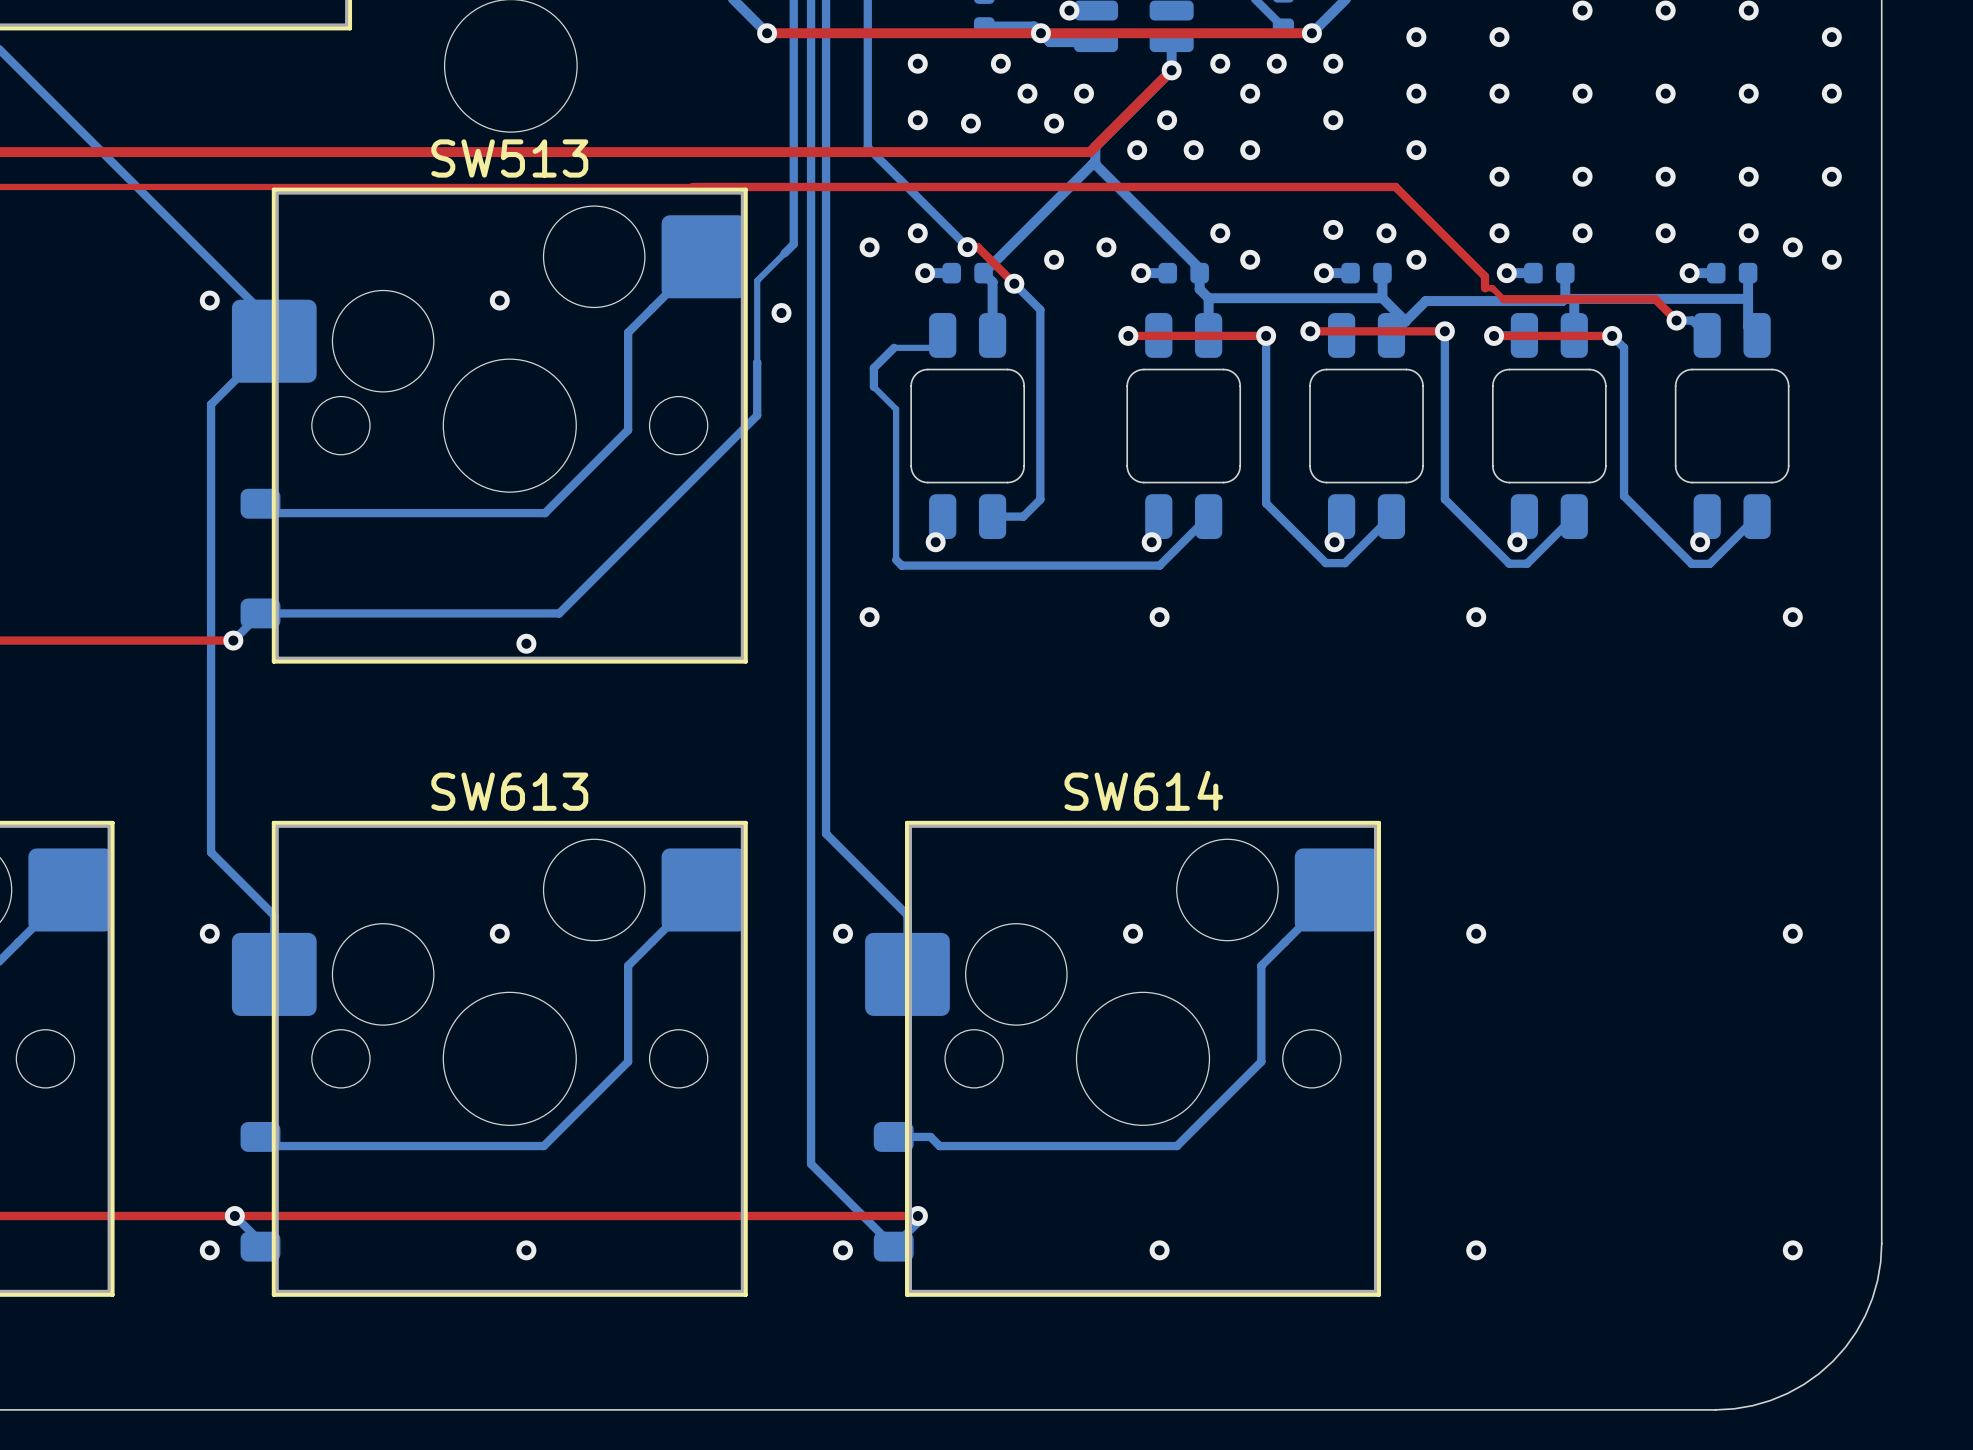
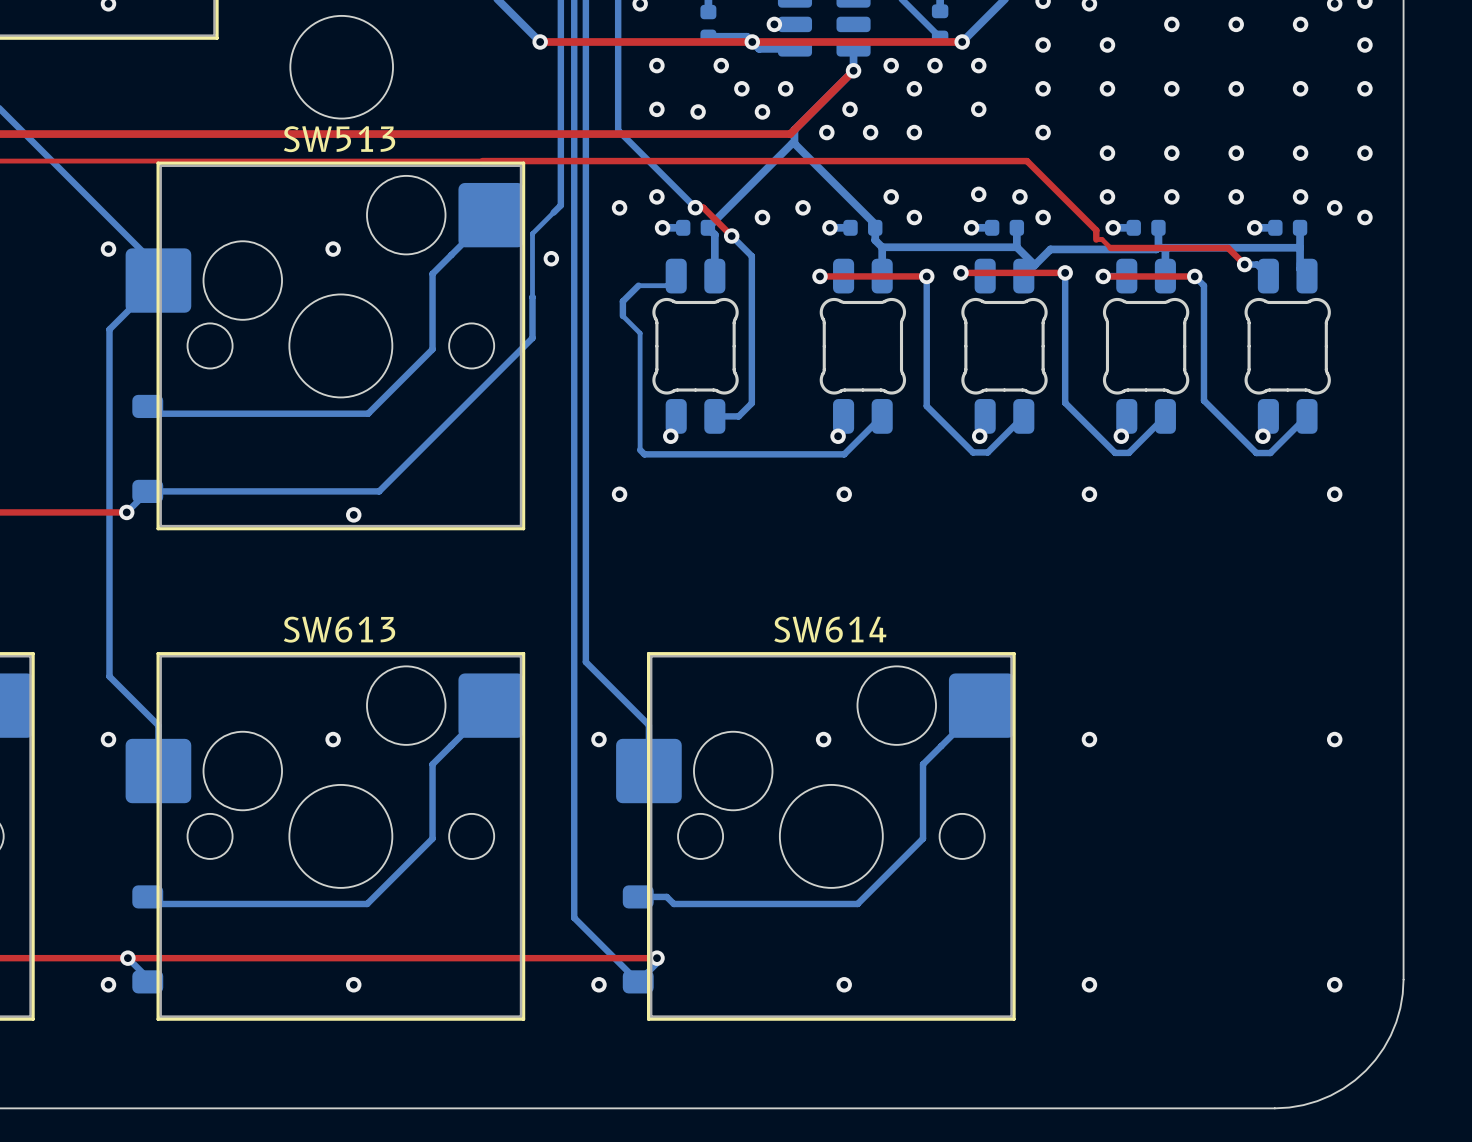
part footprint: [910, 313, 1025, 540] -> [652, 258, 739, 434]
part footprint: [1126, 313, 1242, 540] -> [819, 258, 907, 434]
part footprint: [1309, 313, 1424, 540] -> [961, 258, 1048, 434]
part footprint: [1492, 313, 1607, 540] -> [1102, 258, 1190, 434]
part footprint: [1674, 313, 1790, 540] -> [1244, 258, 1331, 434]

